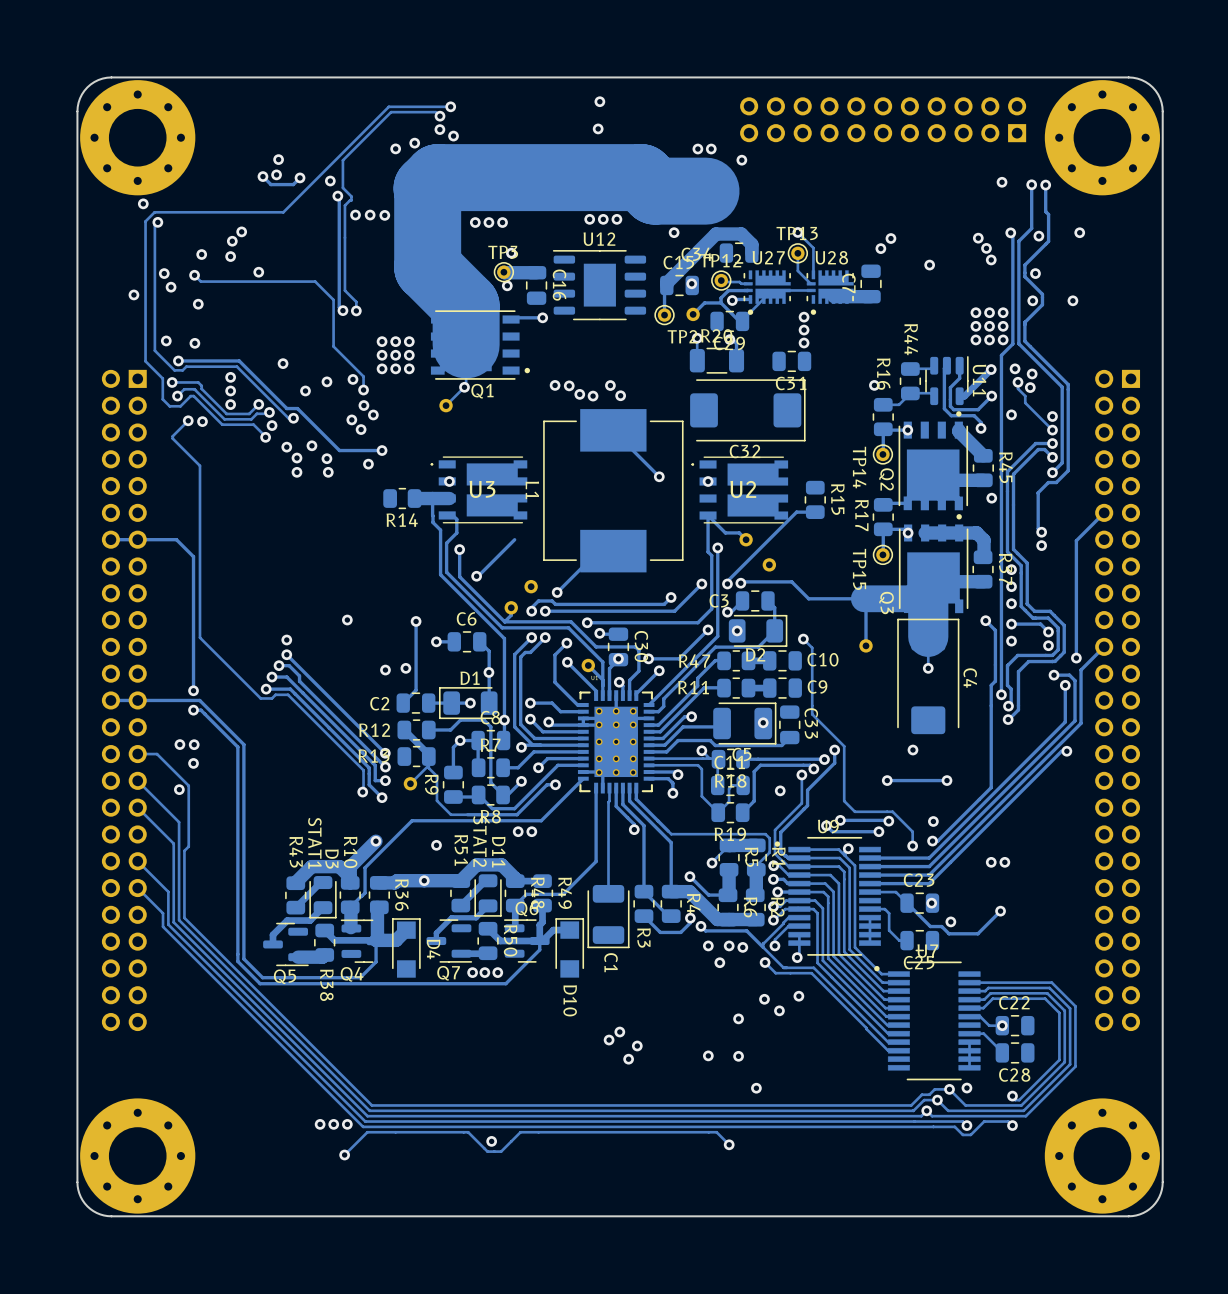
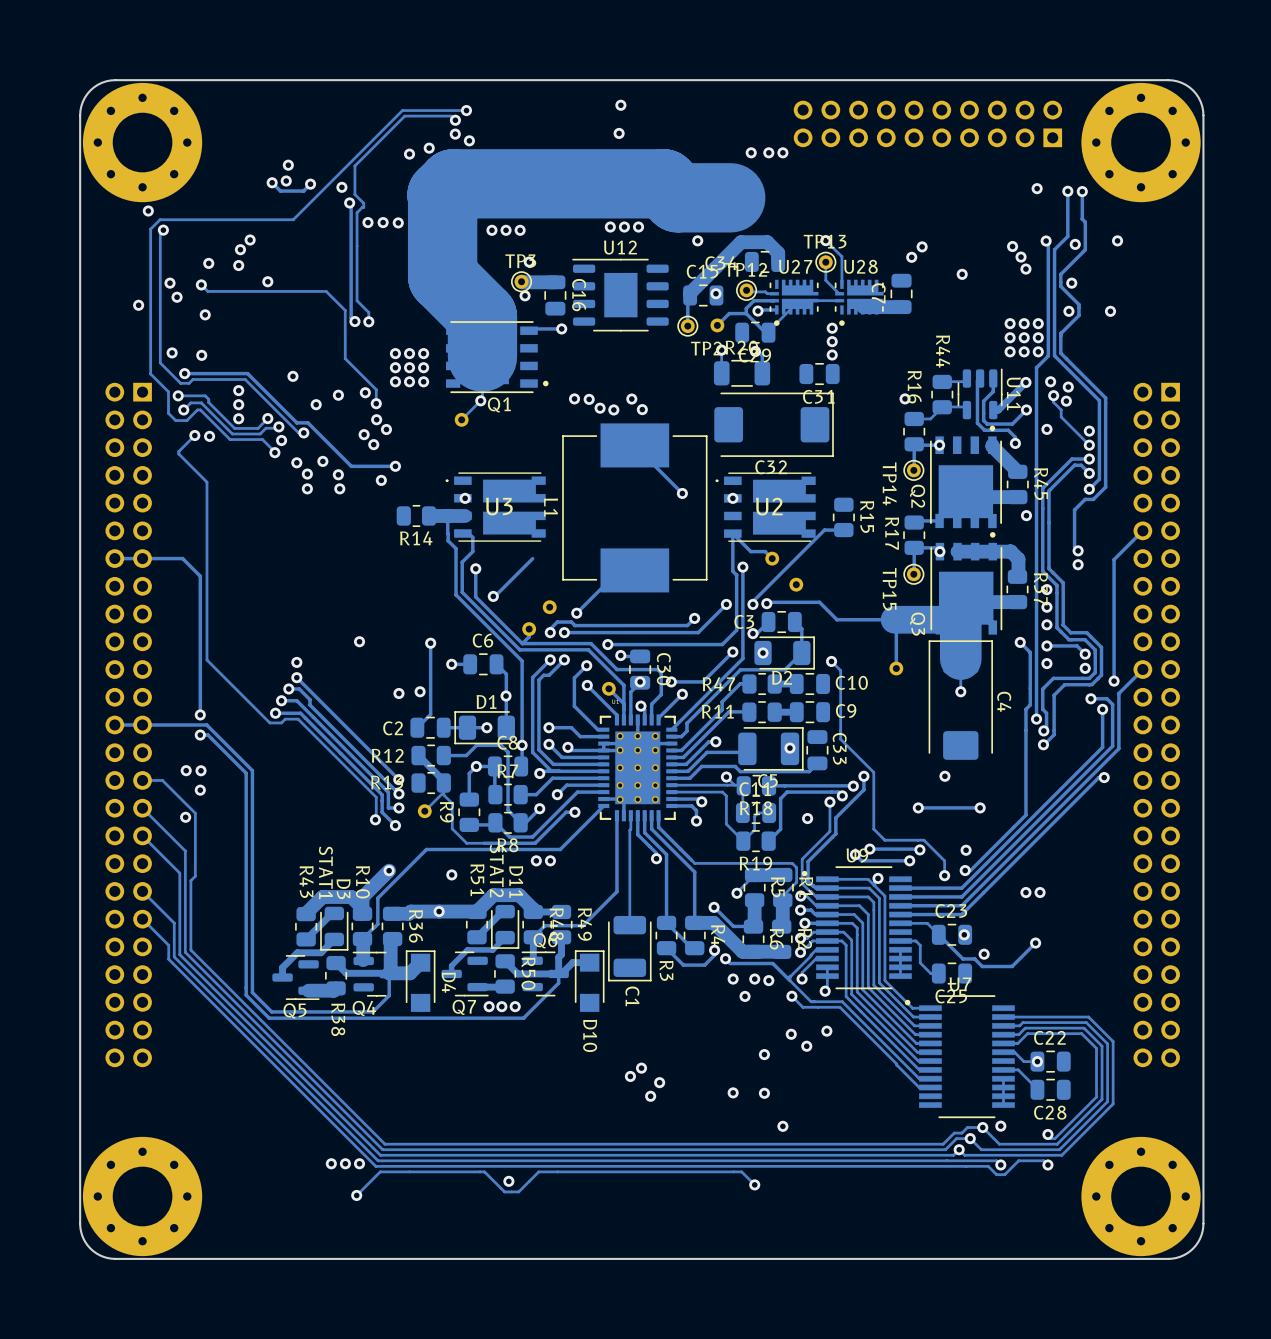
part footprint: [740, 97, 1027, 143] -> [793, 100, 1063, 148]
via: none -> (751, 152)
via: none -> (768, 152)
via: none -> (782, 152)
via: (697, 149) -> none
via: (711, 149) -> none
via: (741, 160) -> none

